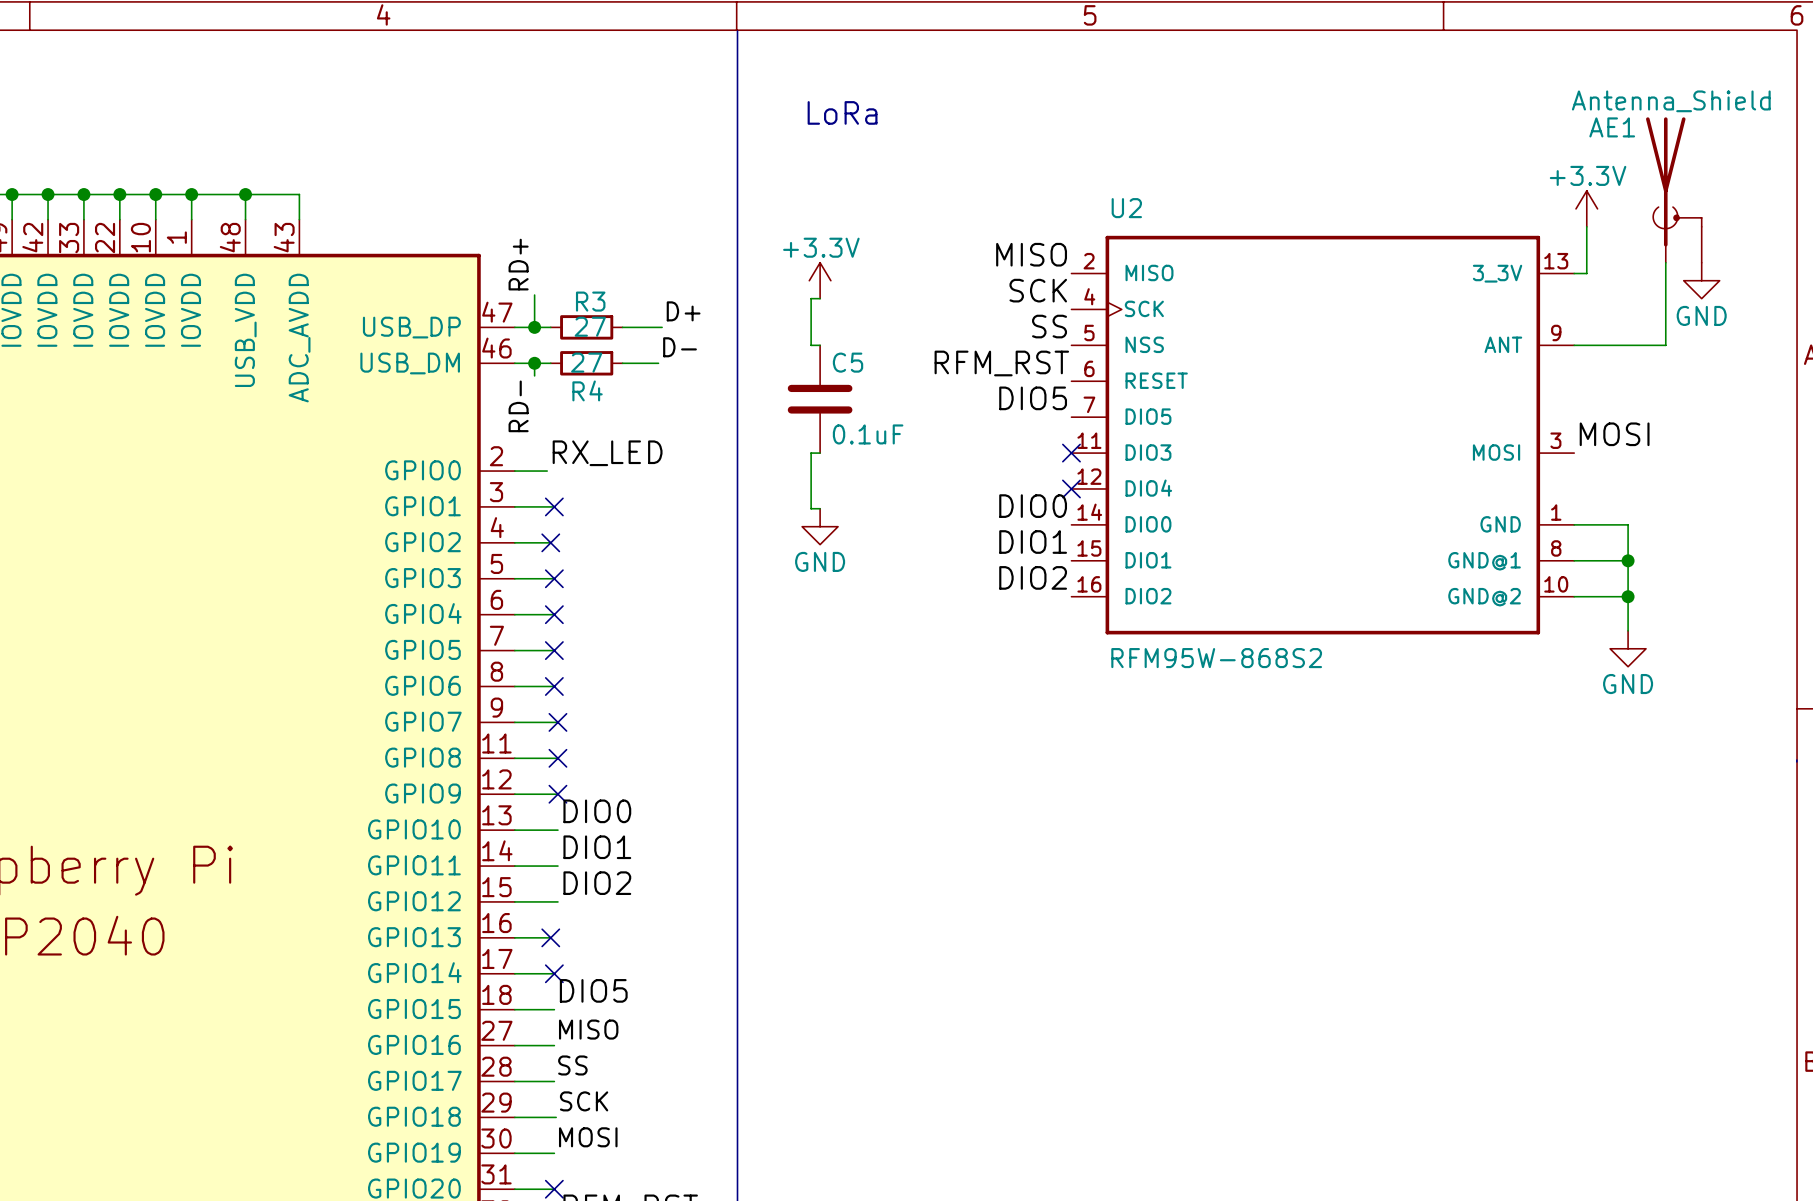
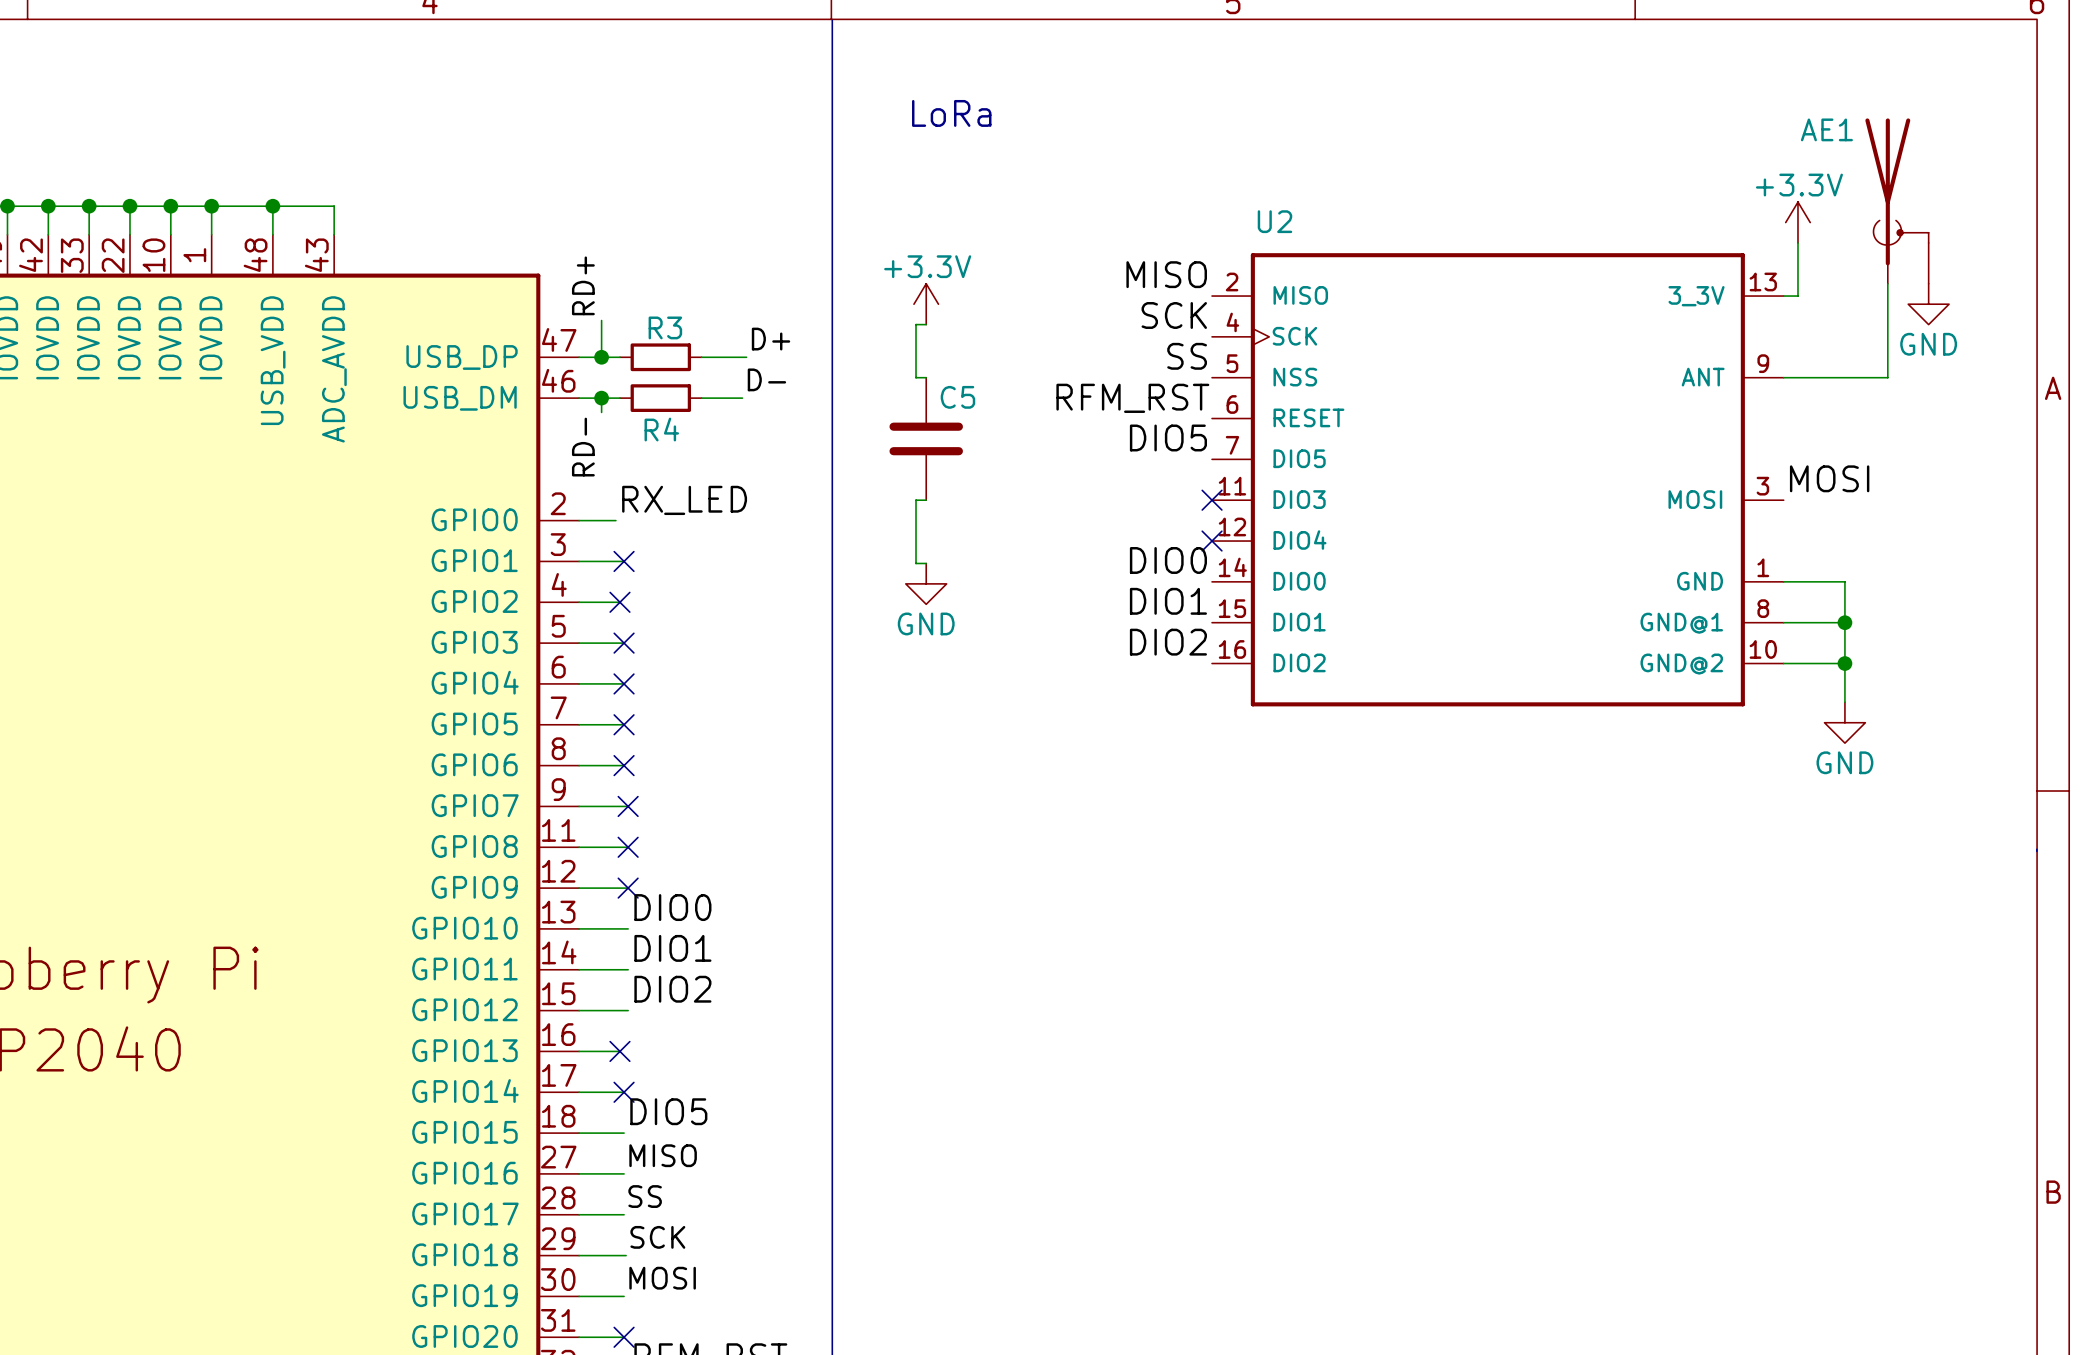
AE1 value: Antenna_Shield (1671, 101) -> none
R3 value: 27 (590, 326) -> none
R4 value: 27 (586, 362) -> none
C5 value: 0.1uF (868, 434) -> none
U2 value: RFM95W-868S2 (1216, 658) -> none

